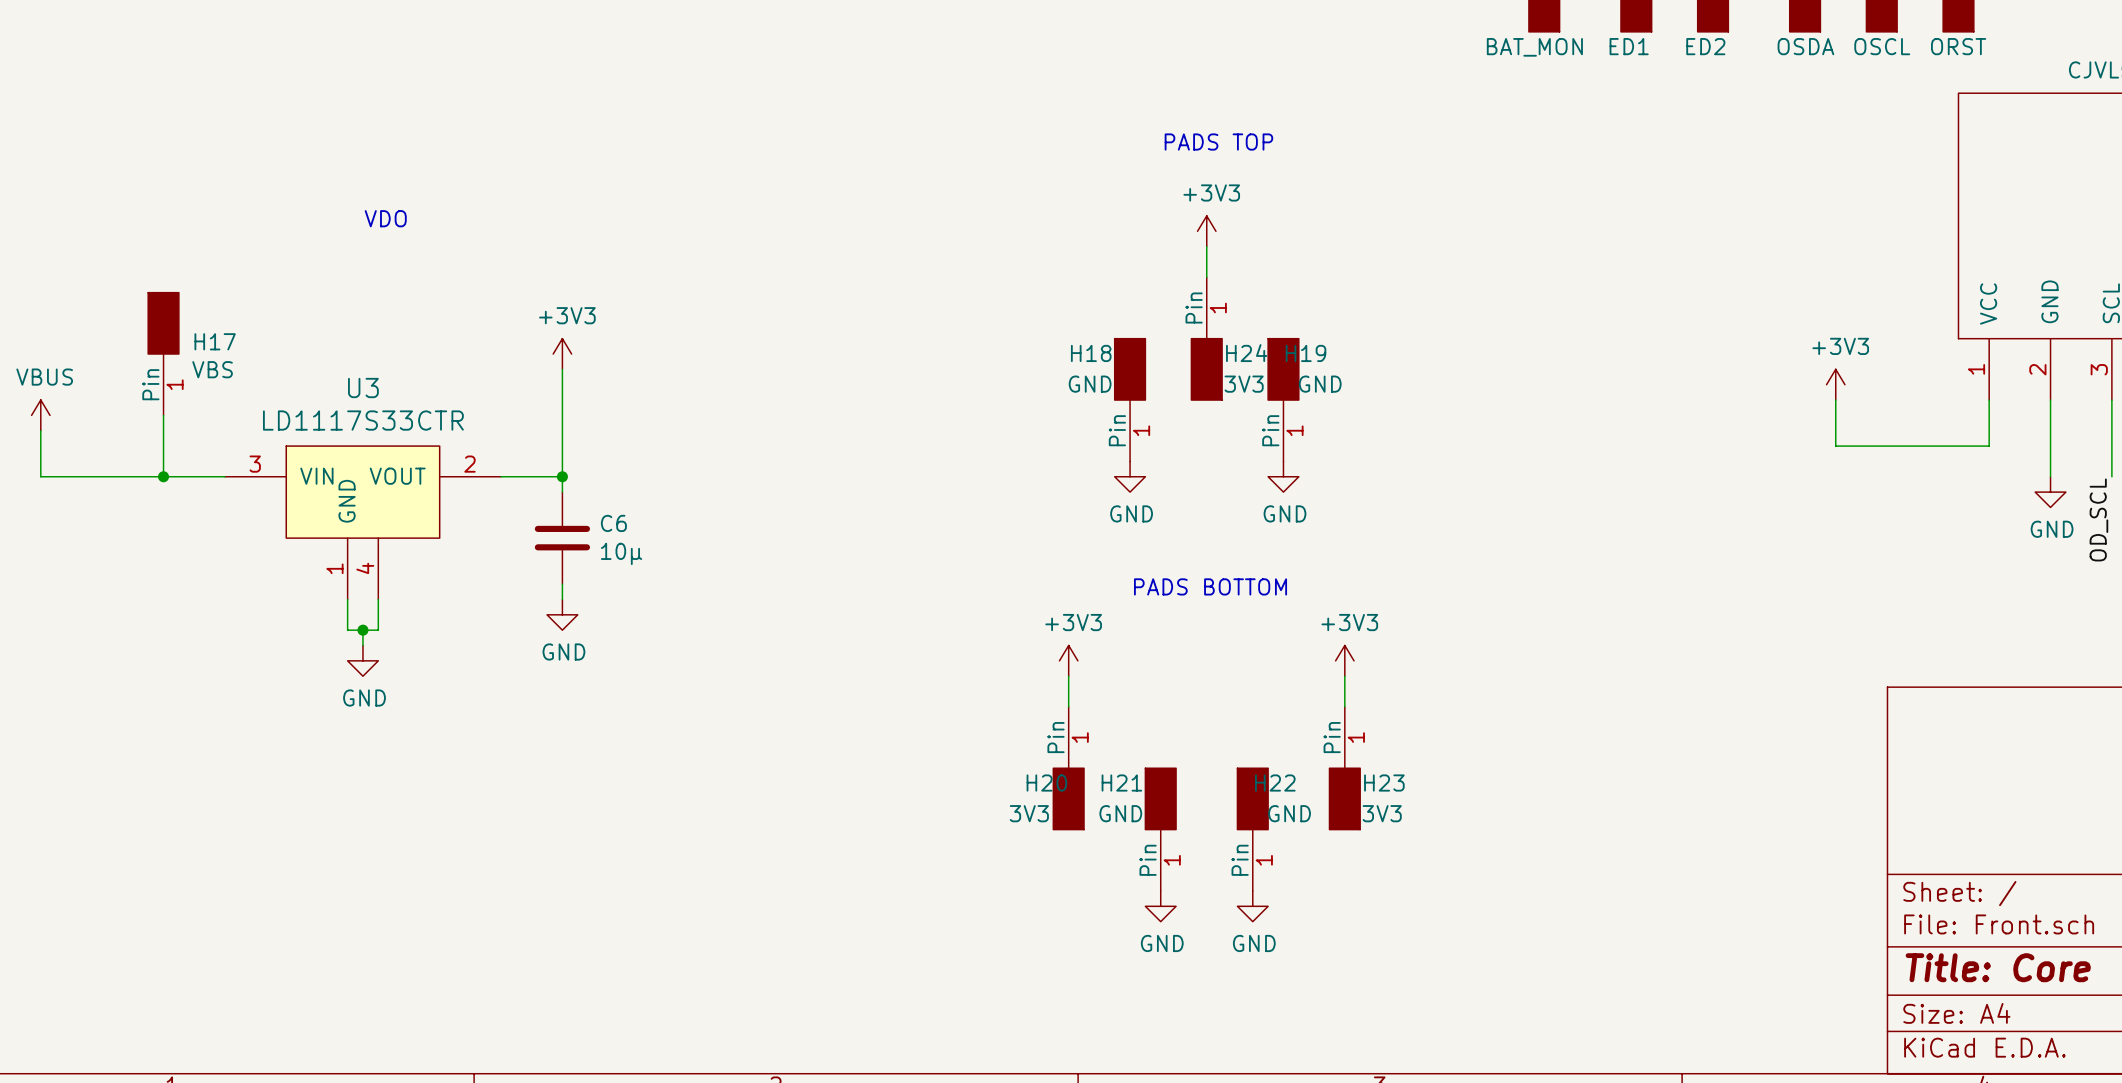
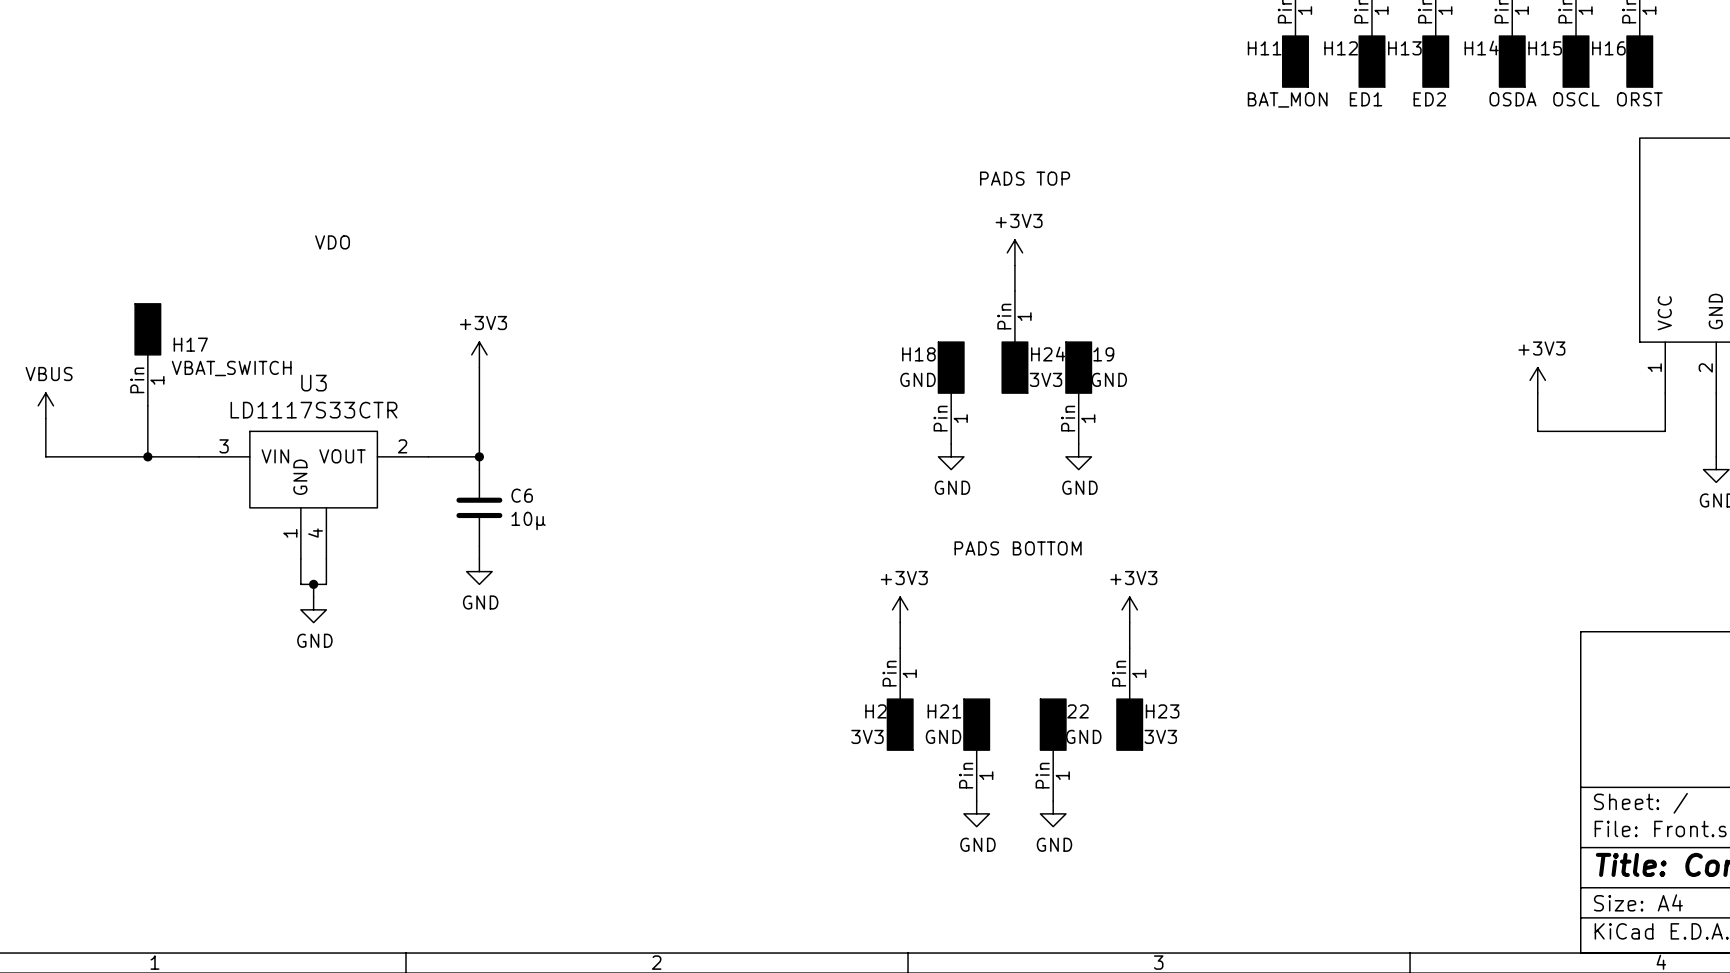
H17 value: VBS (212, 369) -> VBAT_SWITCH (231, 368)

